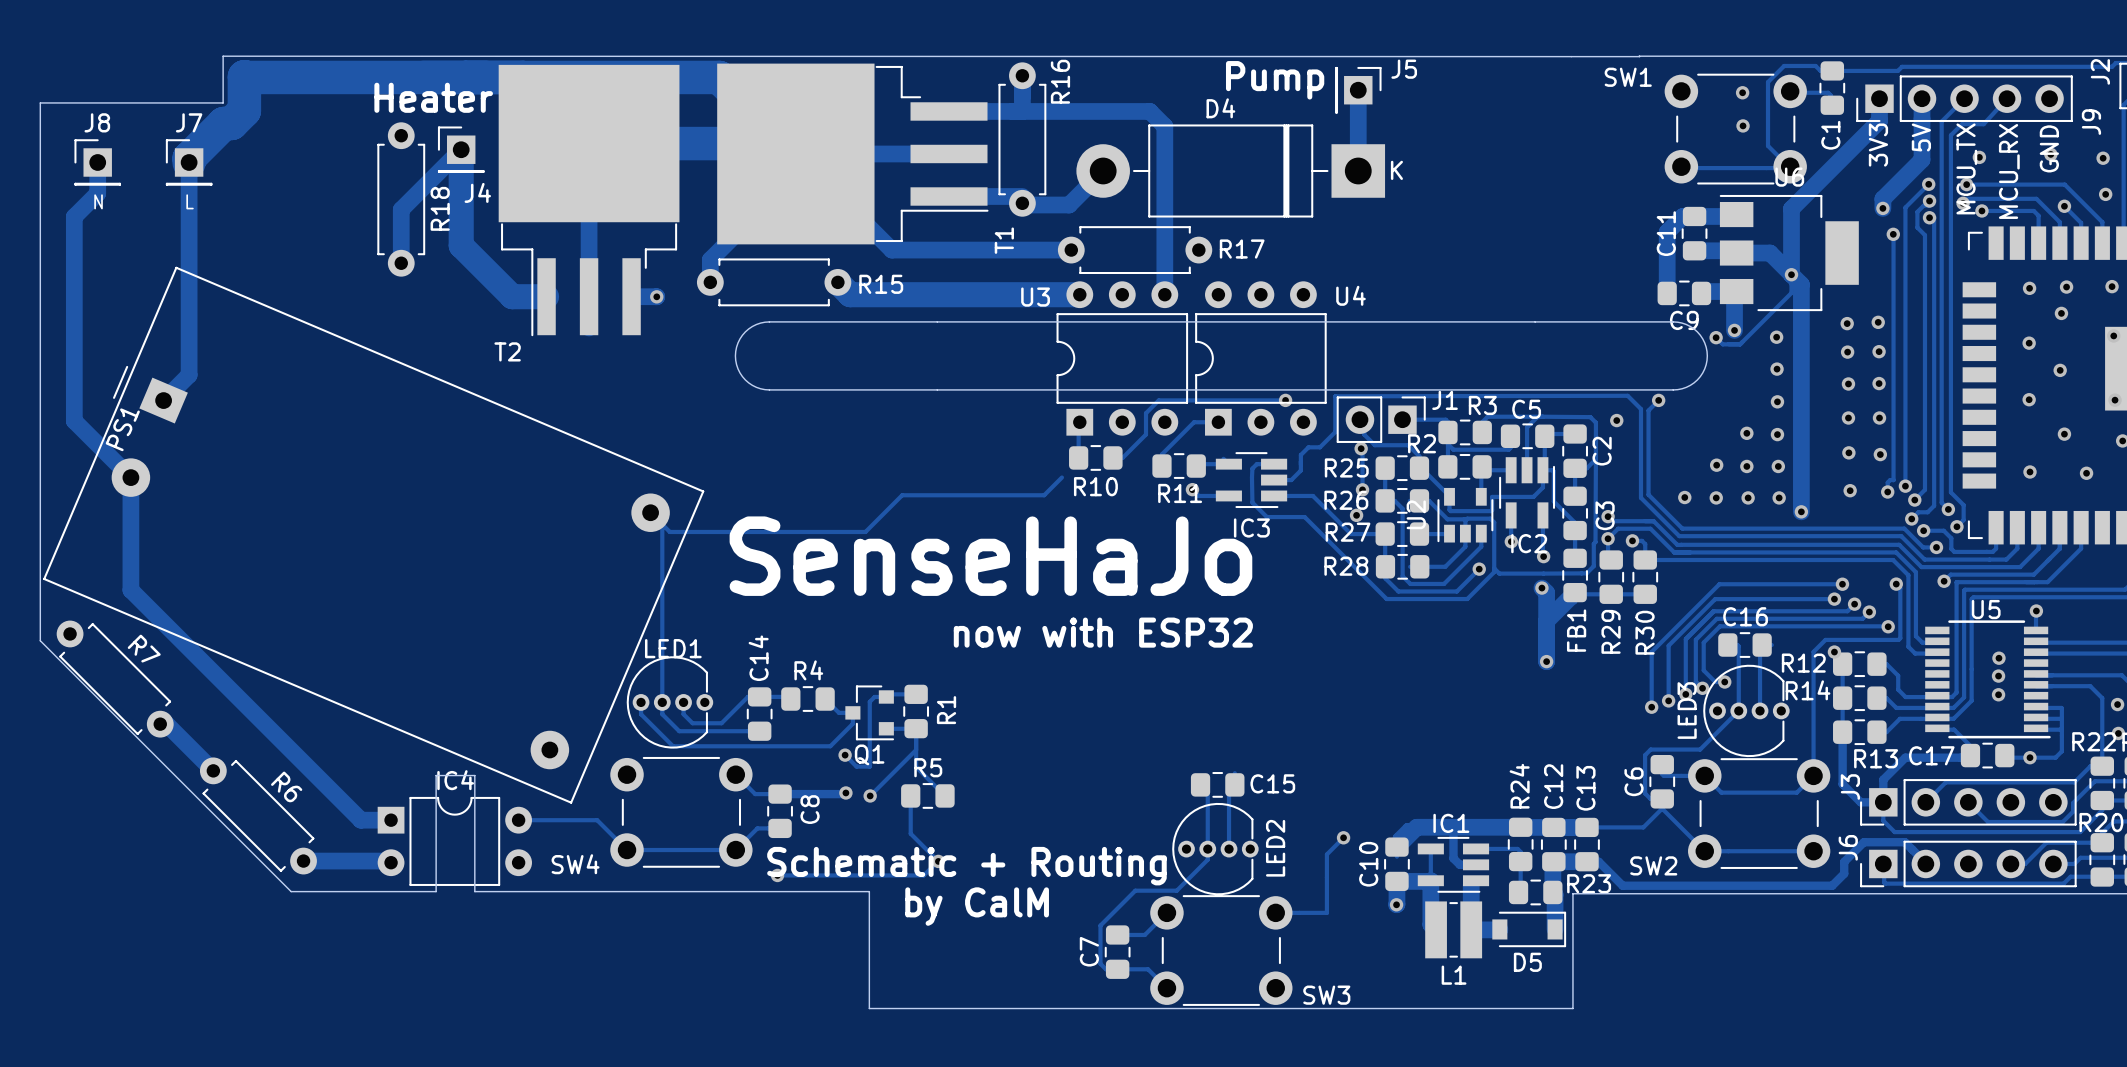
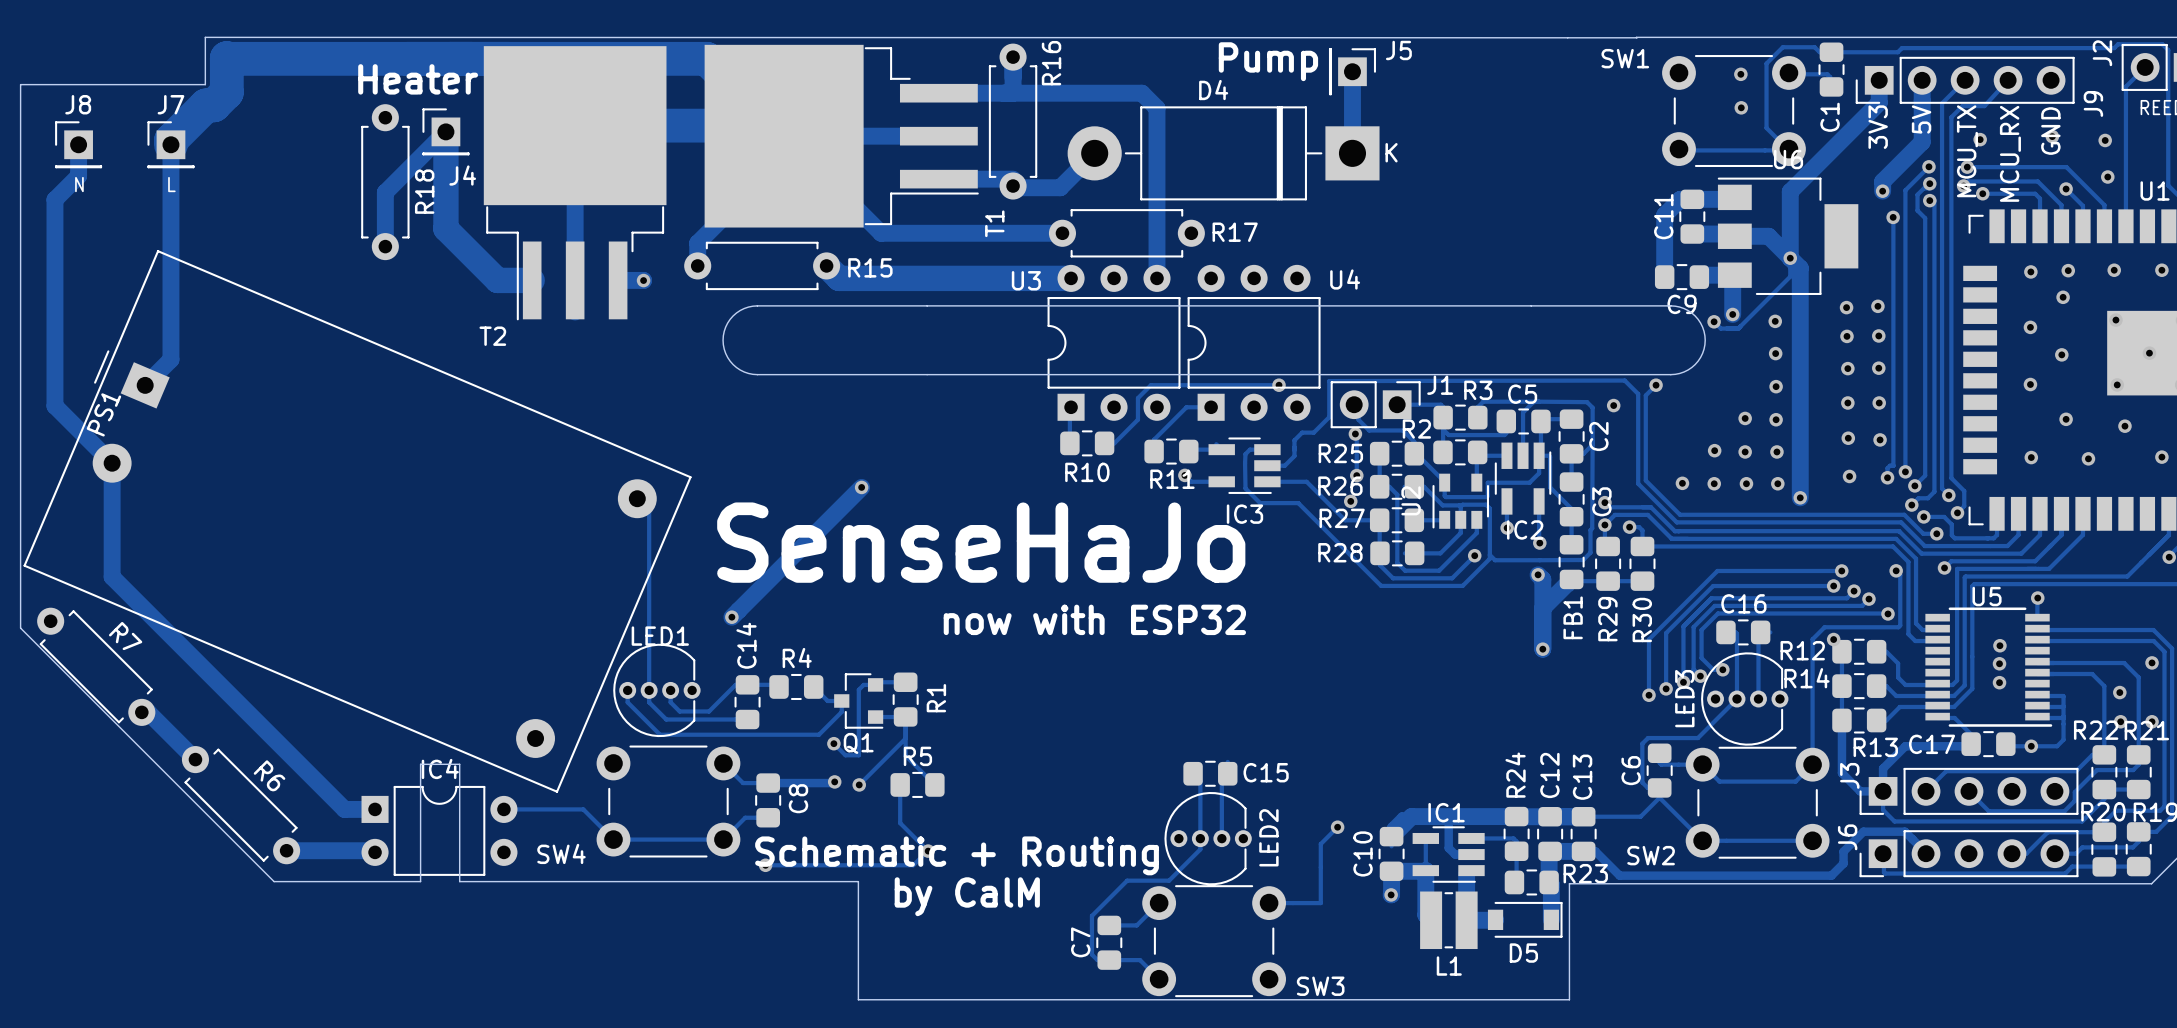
track: (1061, 477) (1044, 495) (902, 495) (865, 531) (669, 531) (662, 524) -> none
track: none -> (861, 487) (731, 617)
via: none -> (861, 487)
via: none -> (731, 617)

